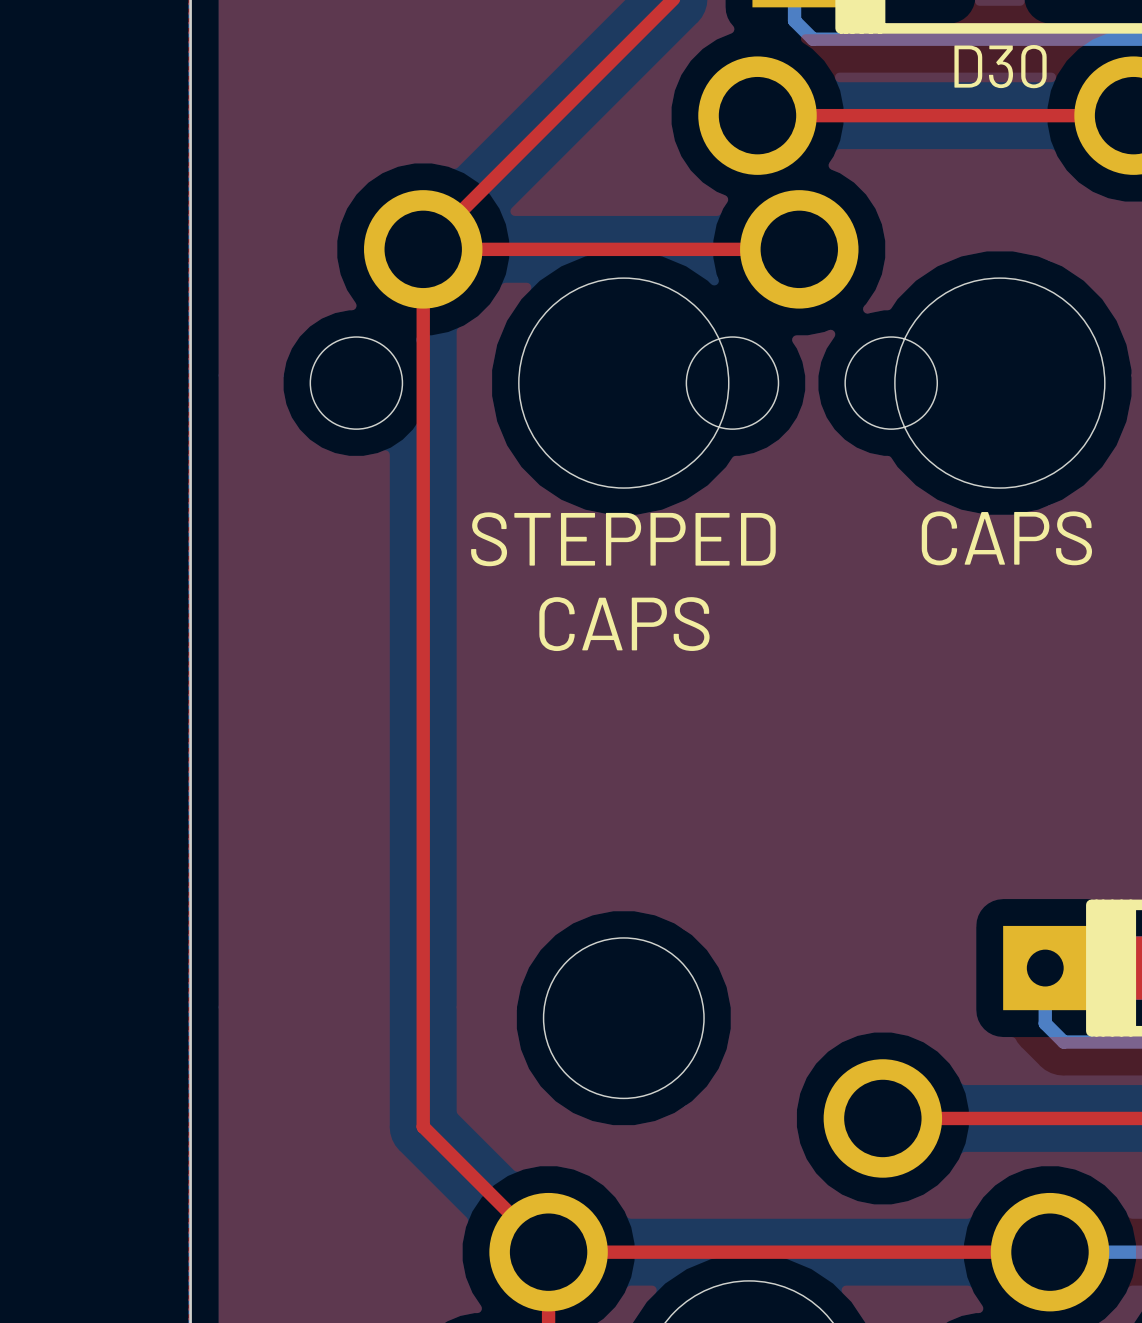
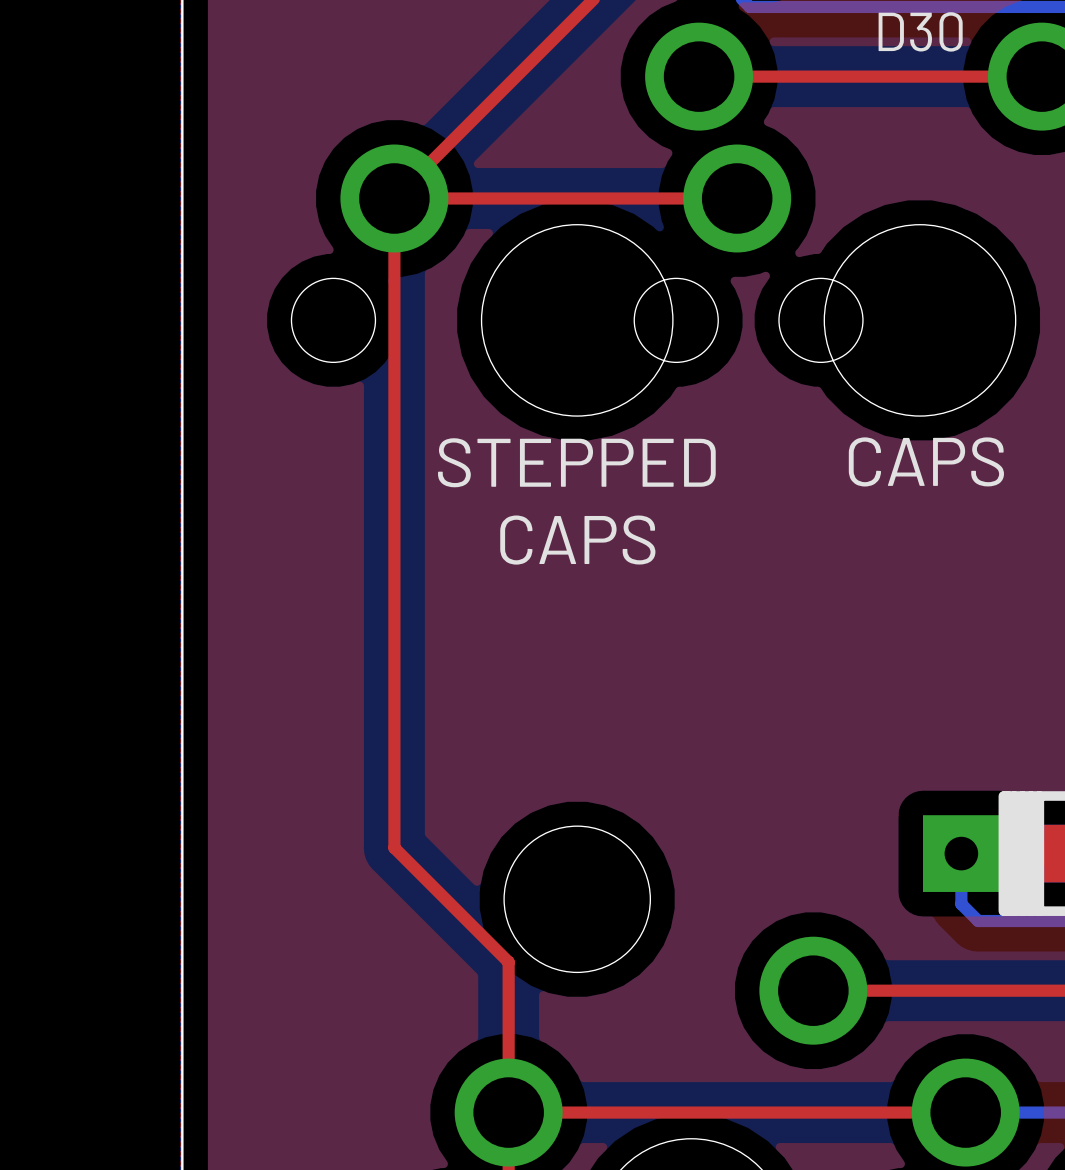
top track: (423, 961) (423, 1126) (548, 1252) -> (394, 847) (508, 962) (508, 1112)

